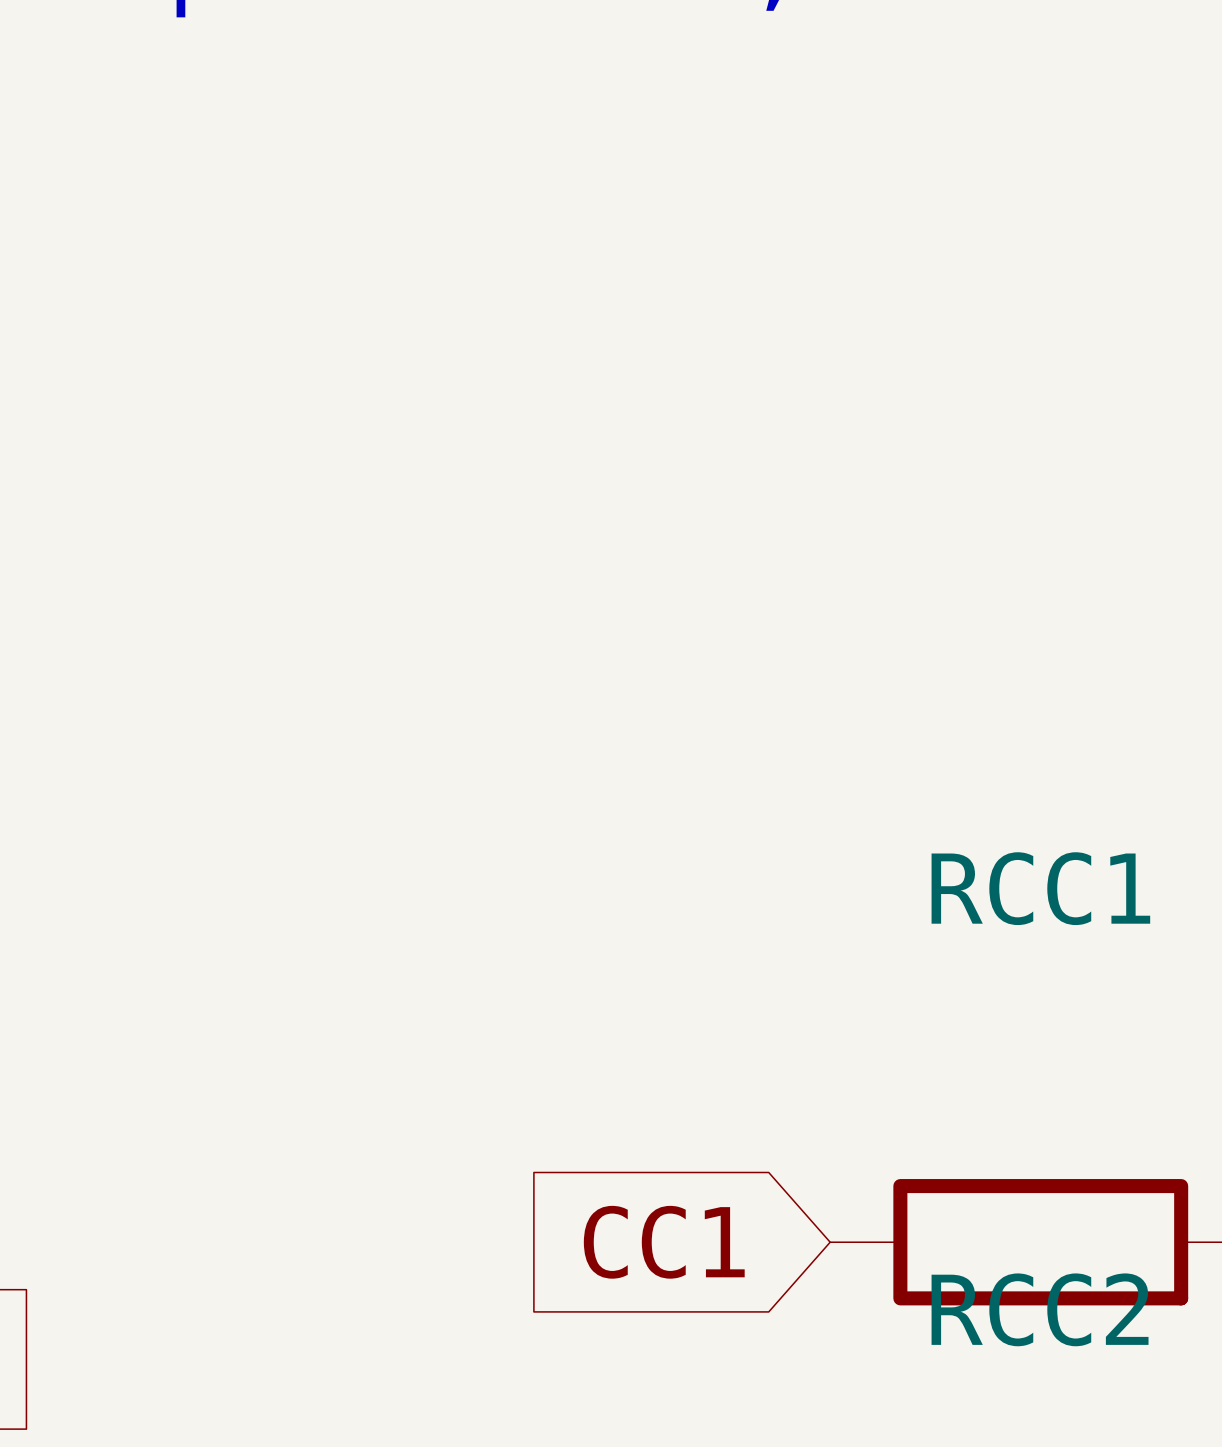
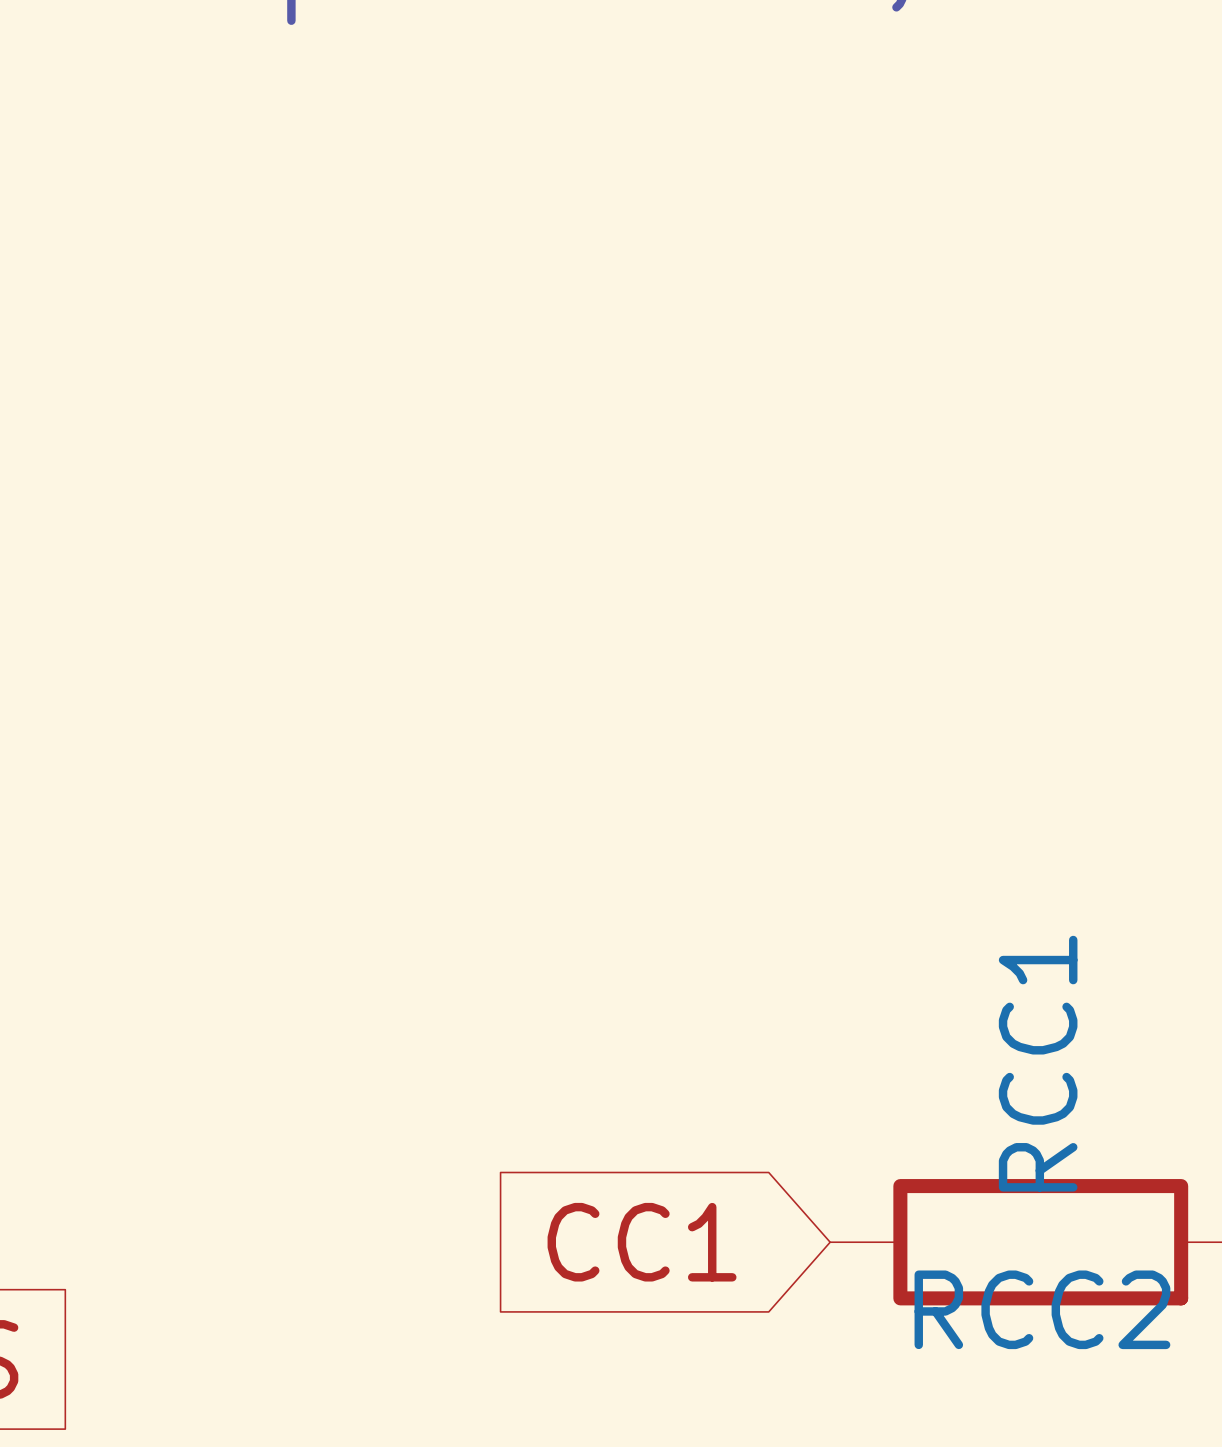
RCC1 name rotation: 0° (1040, 888) -> 90° counterclockwise (1038, 1063)

